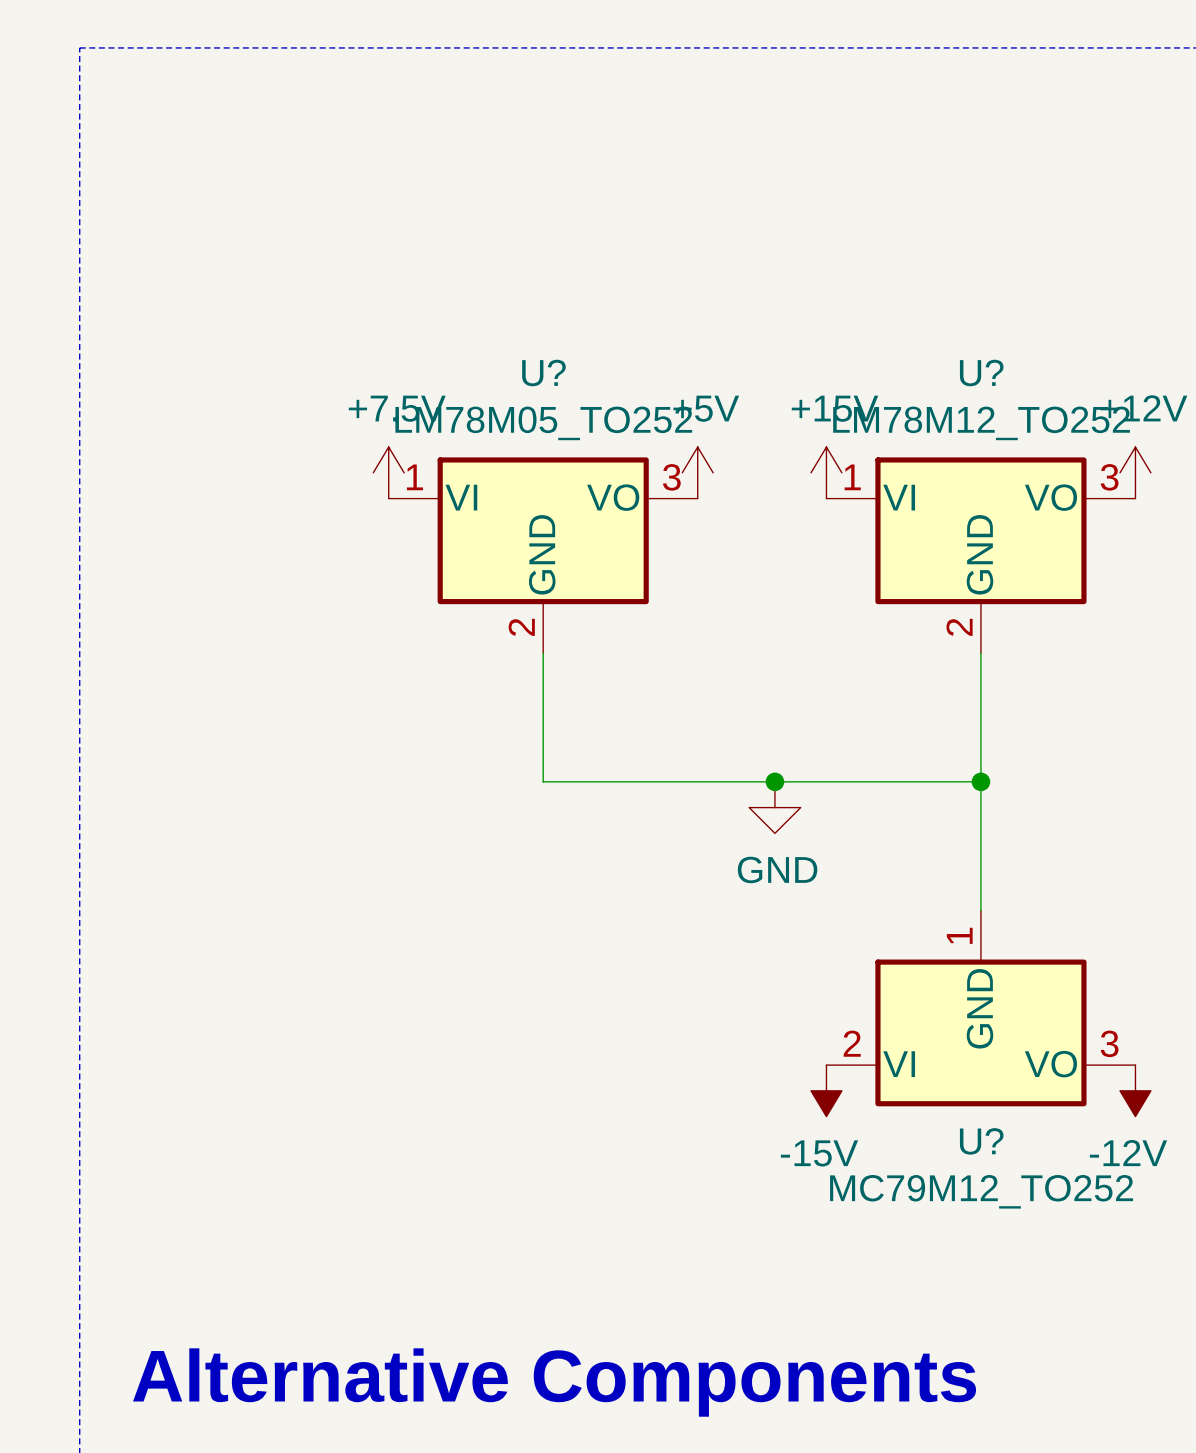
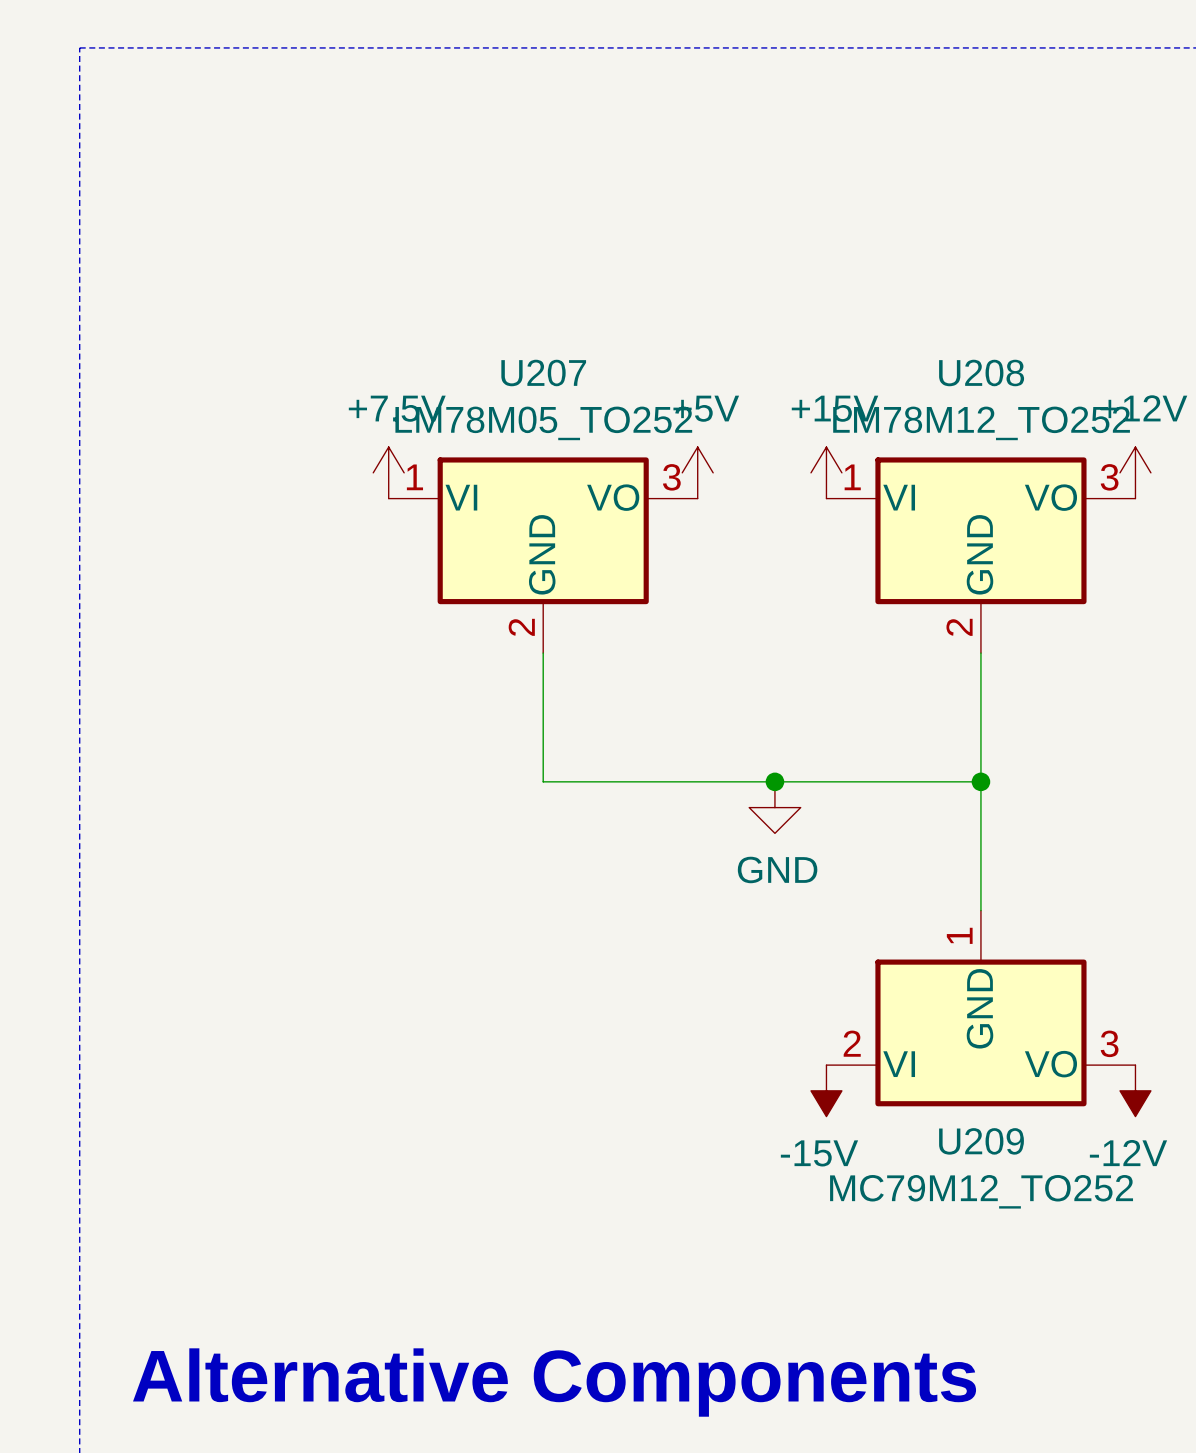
U? name: U? (543, 372) -> U207 (543, 372)
U? name: U? (981, 372) -> U208 (981, 372)
U? name: U? (981, 1141) -> U209 (981, 1141)

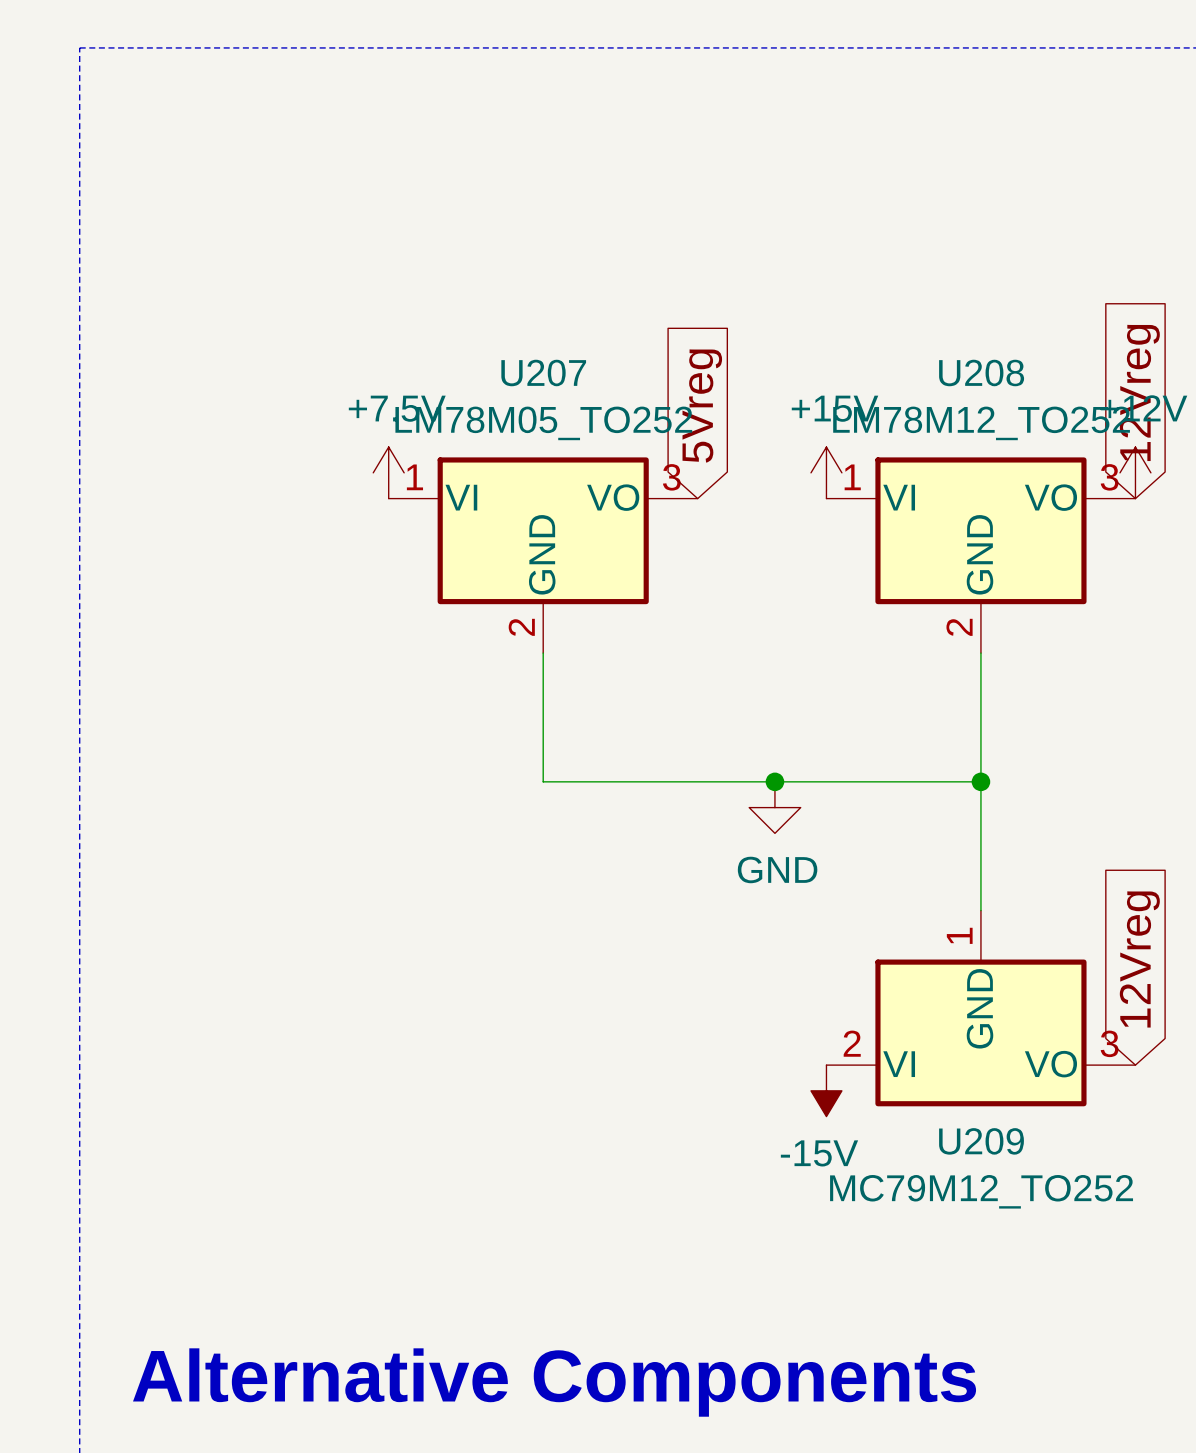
global label: none -> 12Vreg (1139, 392)
global label: none -> 5Vreg (702, 406)
power symbol: +5V (697, 472) -> none
global label: none -> 12Vreg (1139, 959)
power symbol: -12V (1135, 1090) -> none

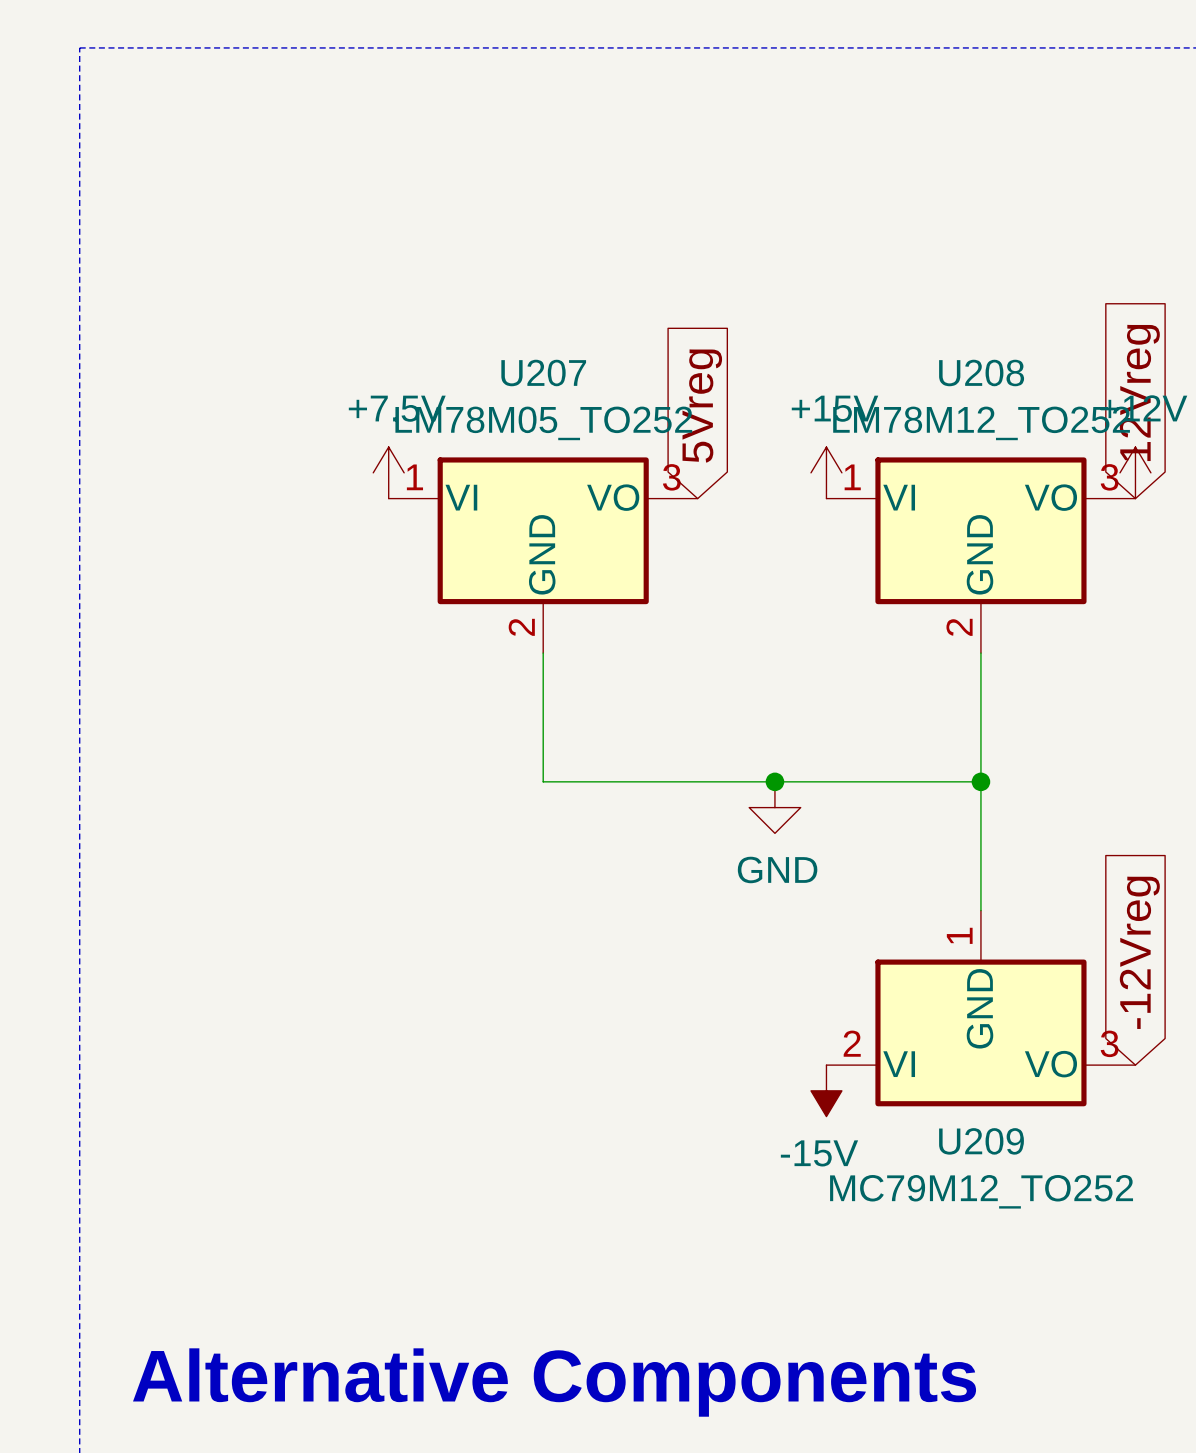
global label: 12Vreg (1139, 959) -> -12Vreg (1139, 952)

